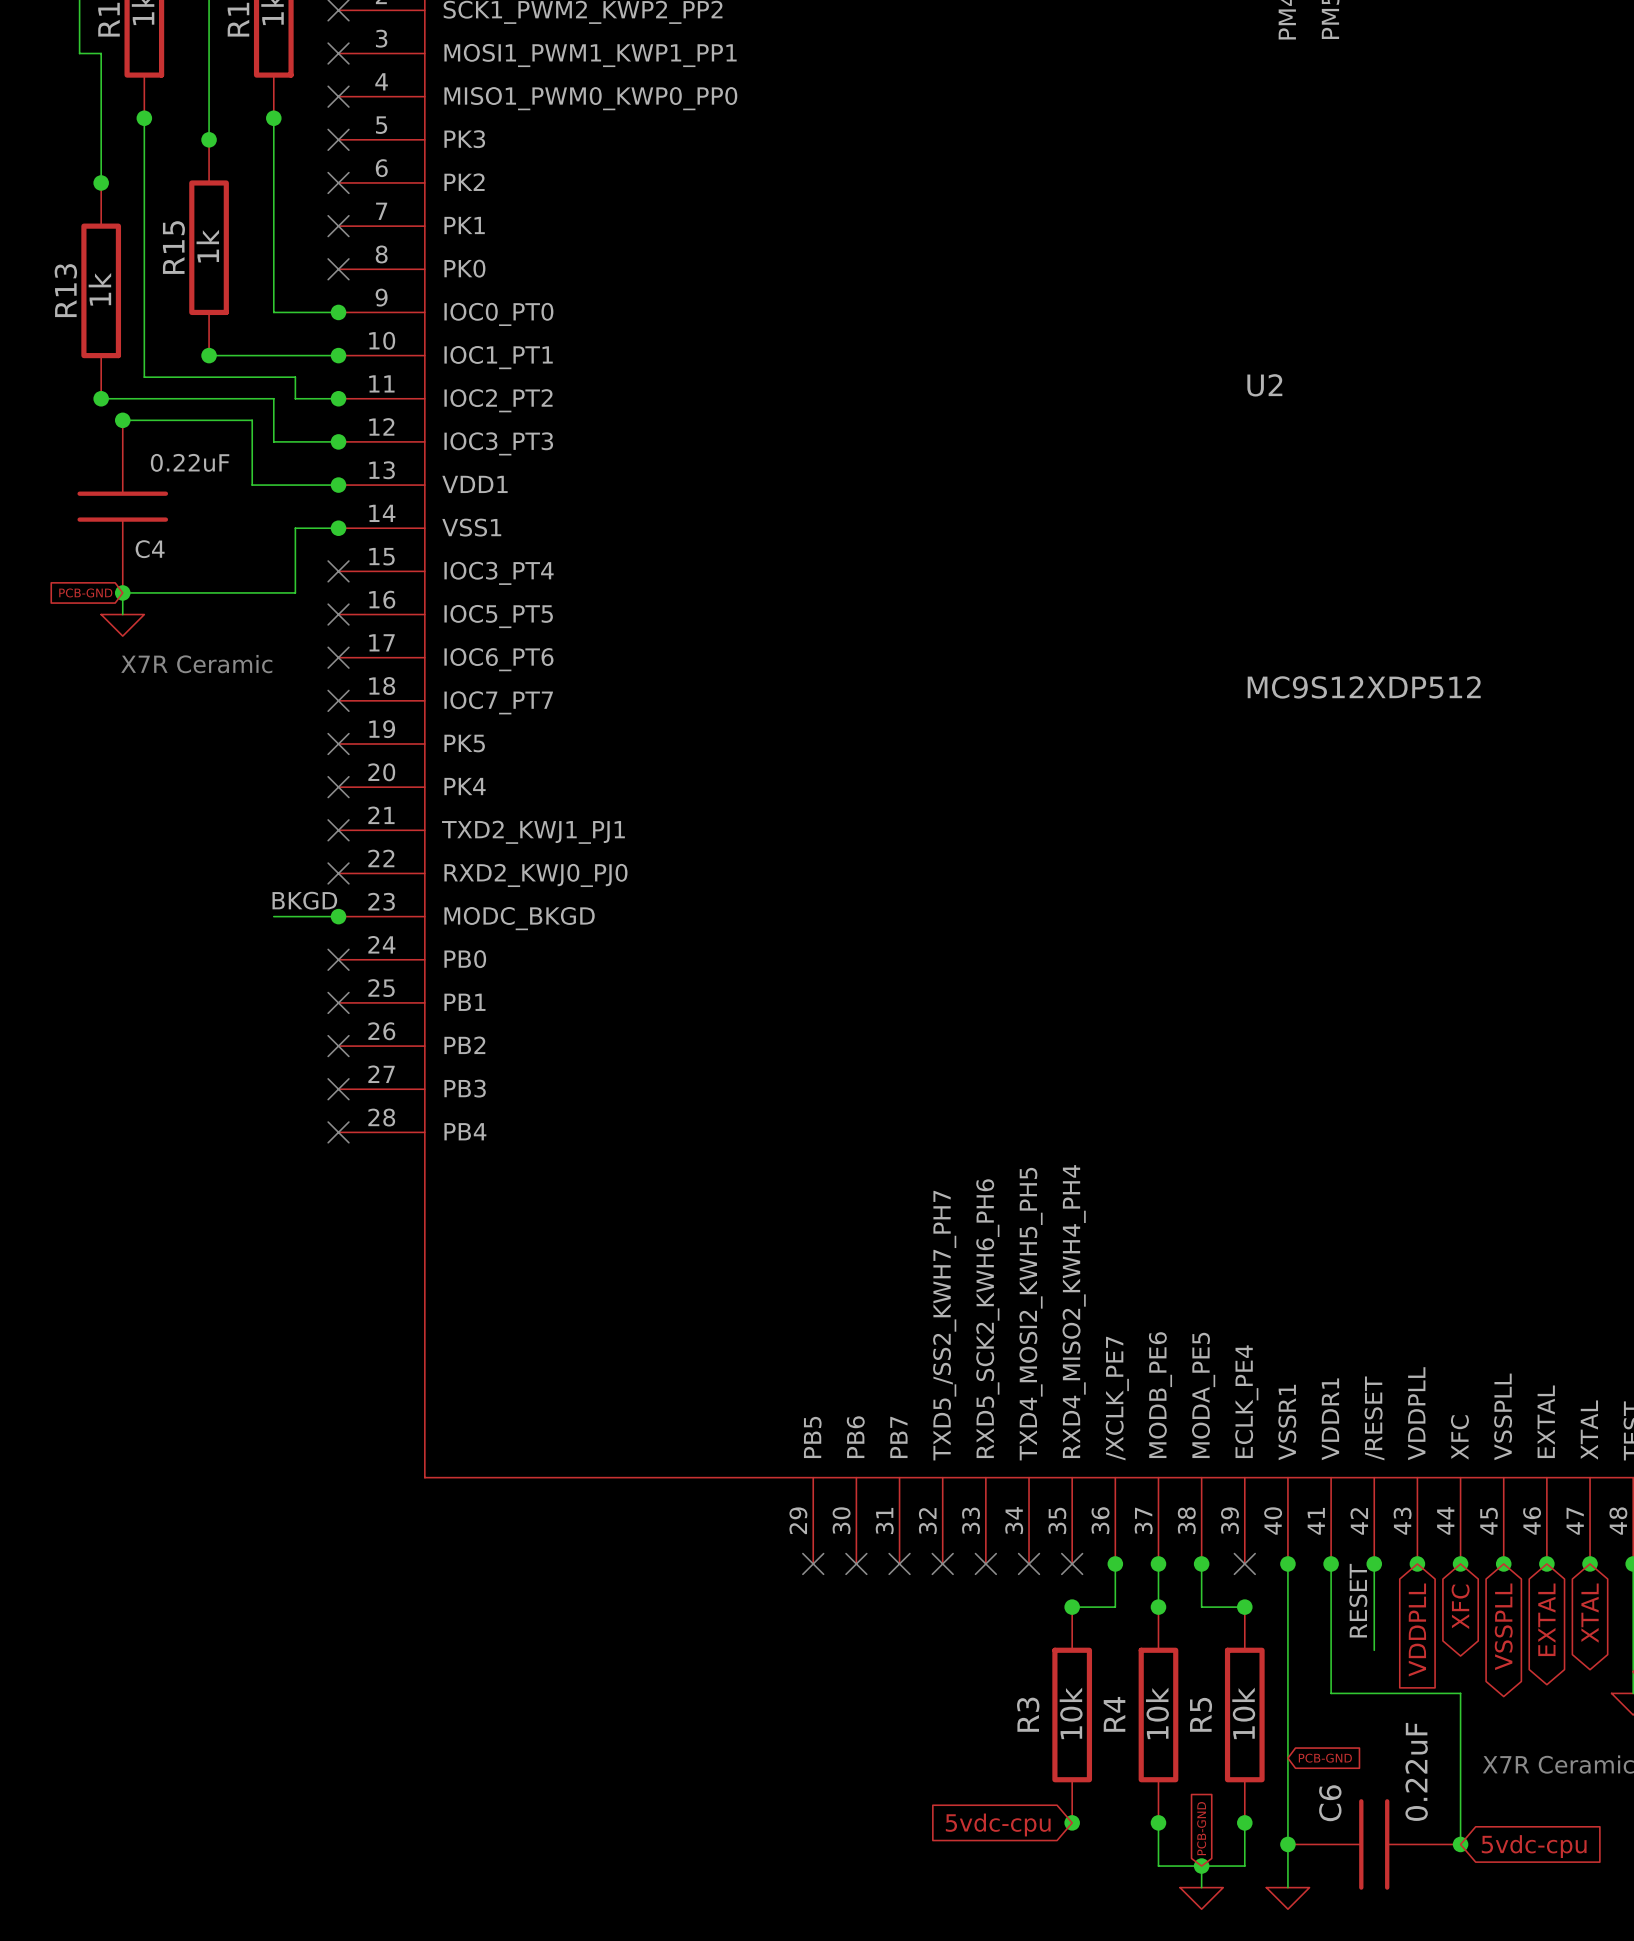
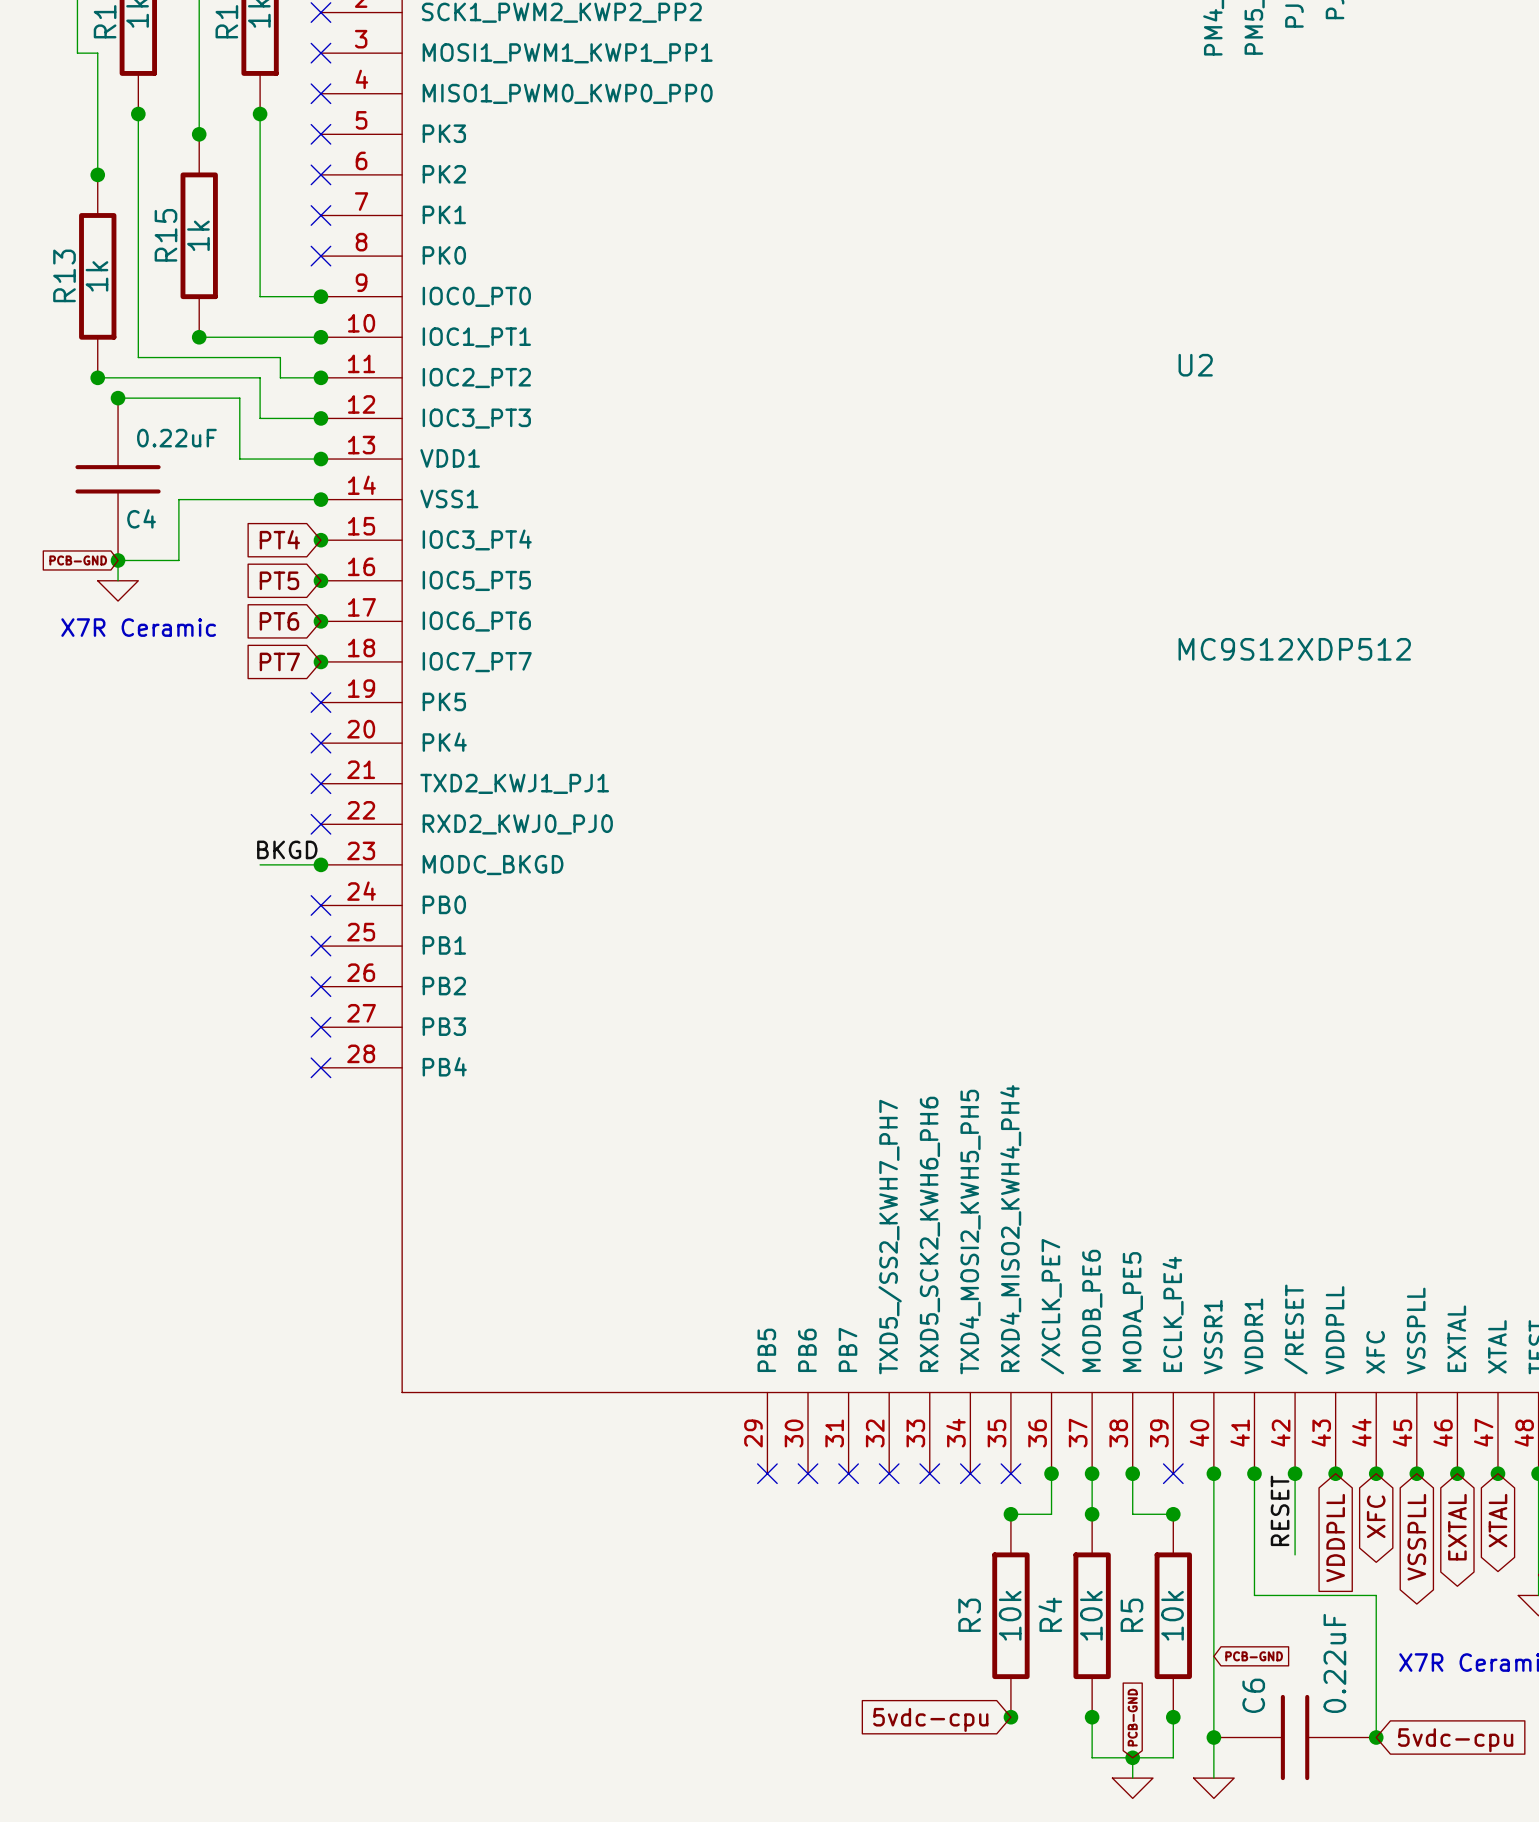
wire: (295, 528) (295, 592) (187, 592) -> (280, 499) (178, 499) (178, 560)
global label: none -> PT4 (279, 539)
no-connect mark: (338, 571) -> none
junction: none -> (320, 540)
global label: none -> PT5 (279, 580)
no-connect mark: (338, 614) -> none
junction: none -> (320, 580)
global label: none -> PT6 (279, 621)
no-connect mark: (338, 657) -> none
junction: none -> (320, 621)
text position: X7R Ceramic (196, 664) -> X7R Ceramic (138, 627)
global label: none -> PT7 (279, 661)
no-connect mark: (338, 700) -> none
junction: none -> (320, 661)

